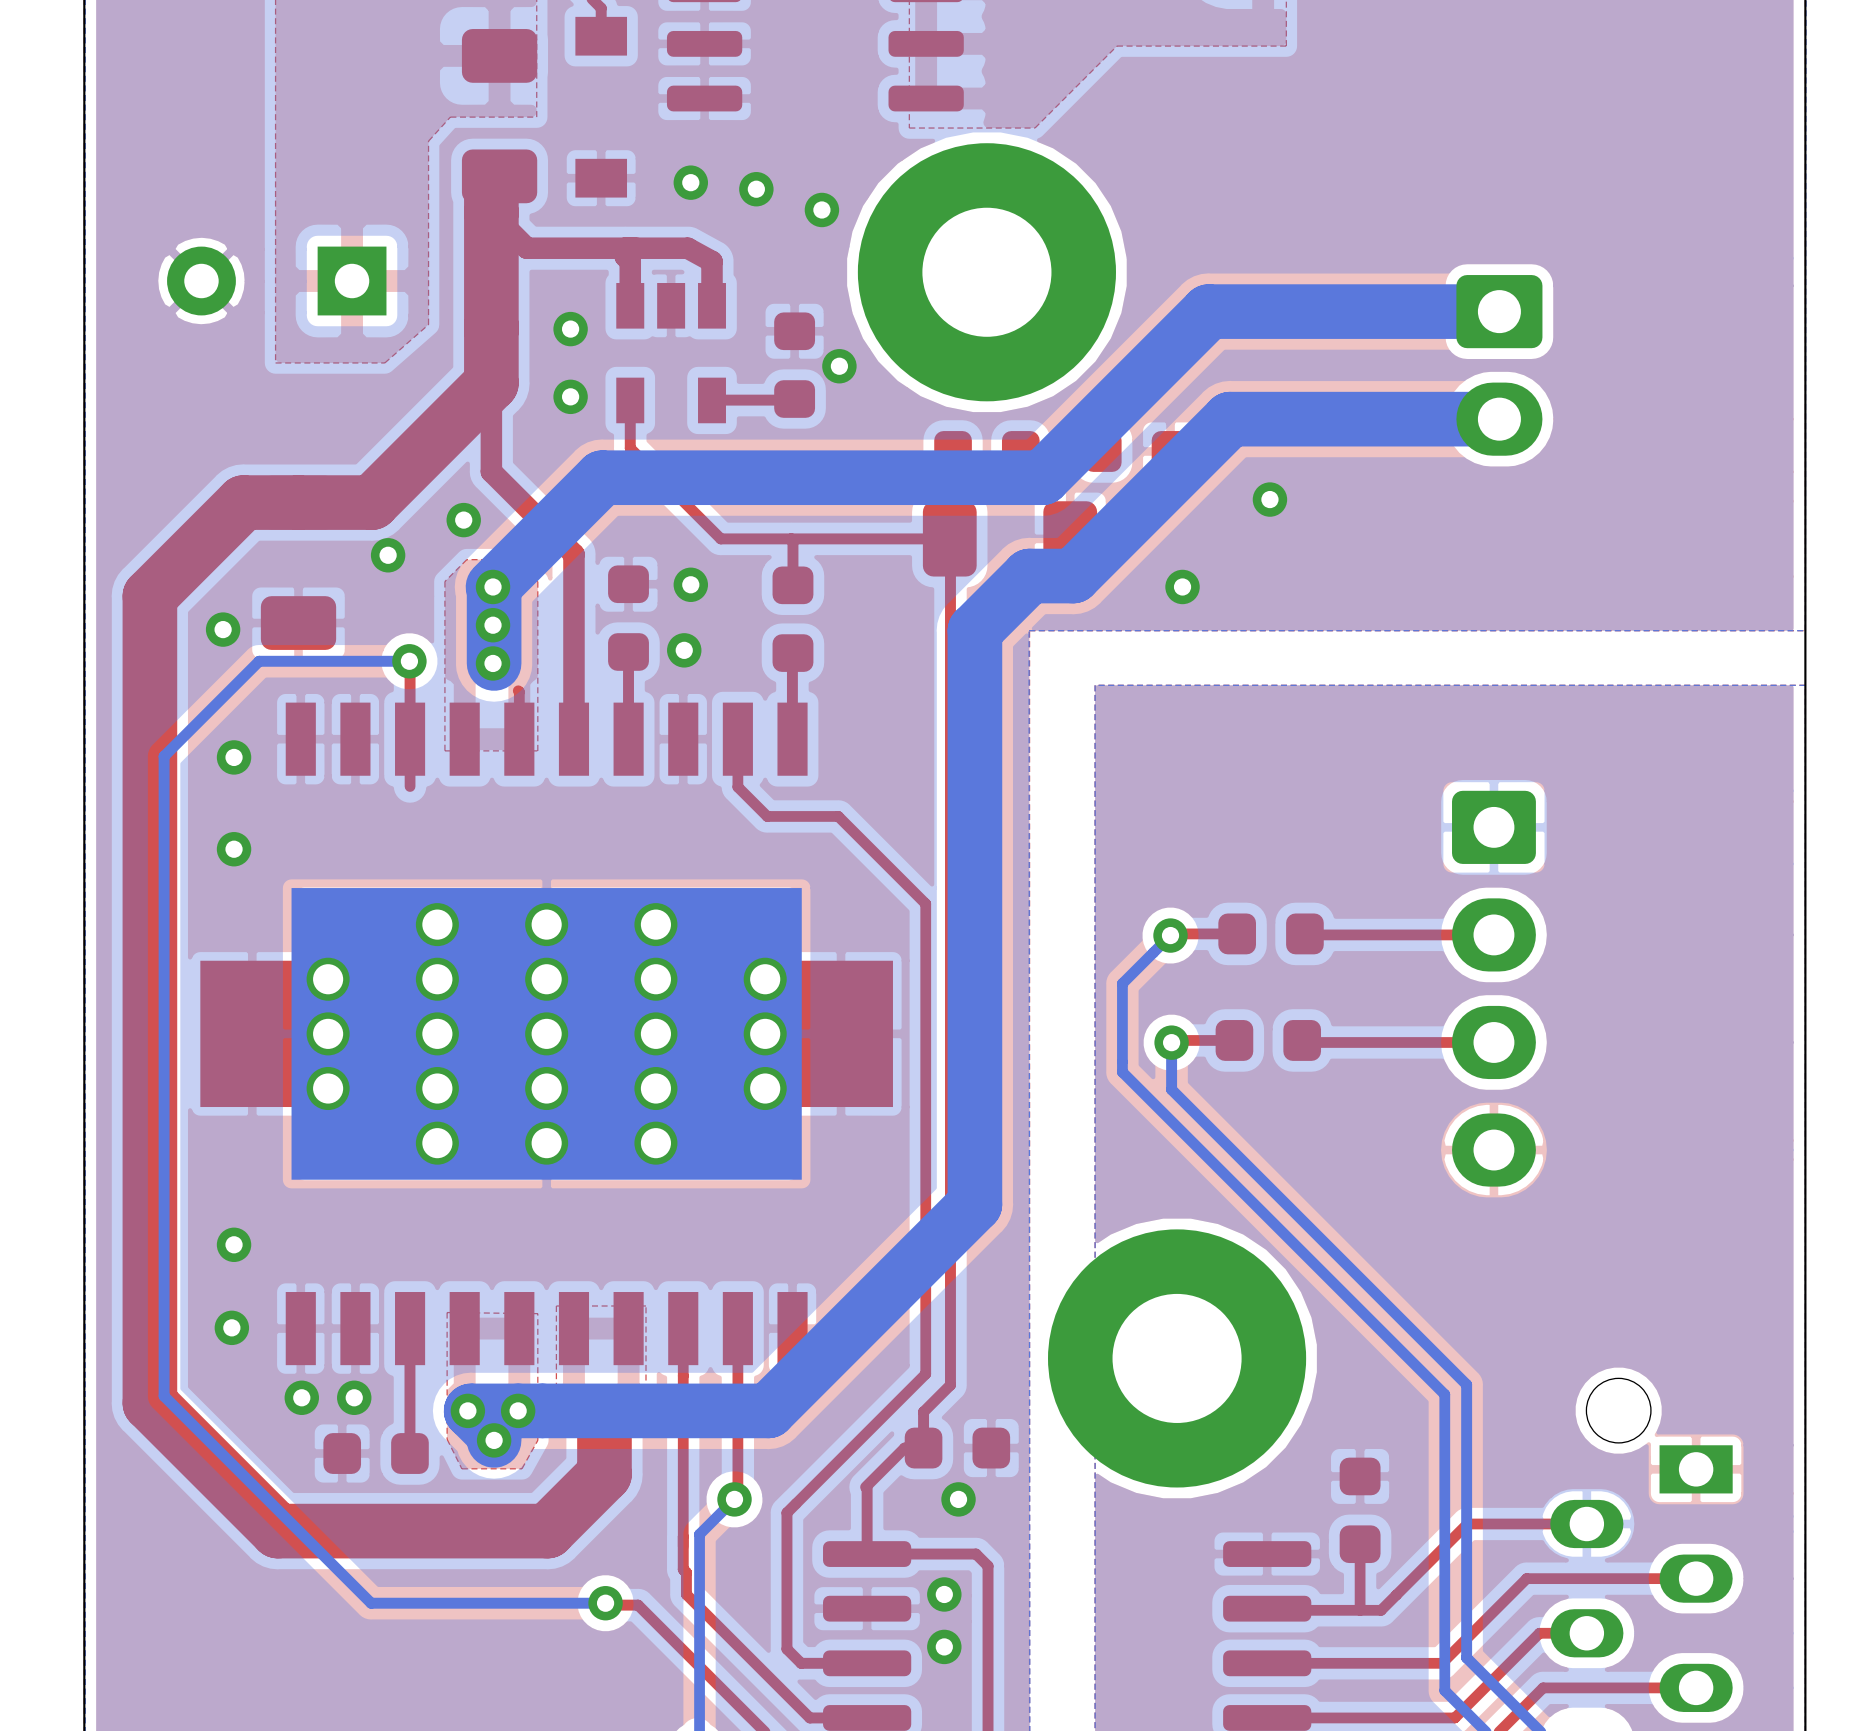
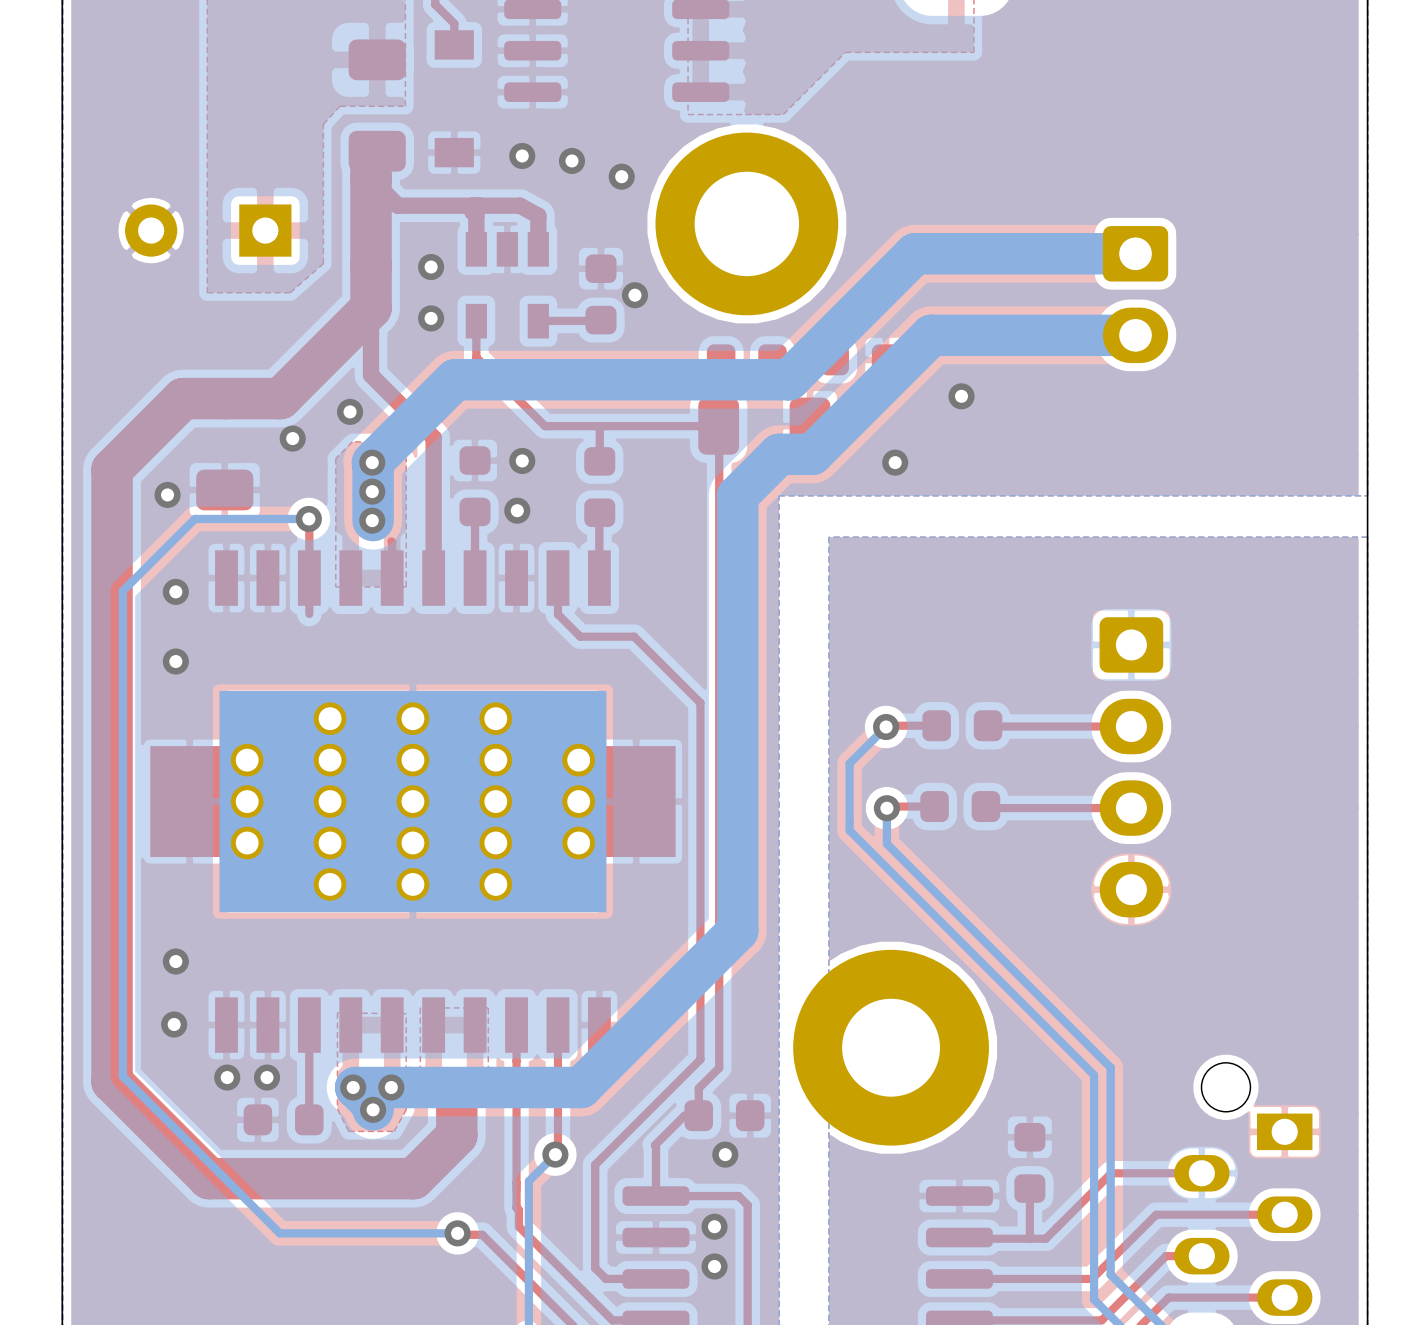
part footprint: [857, 143, 1116, 402] -> [655, 132, 839, 316]

